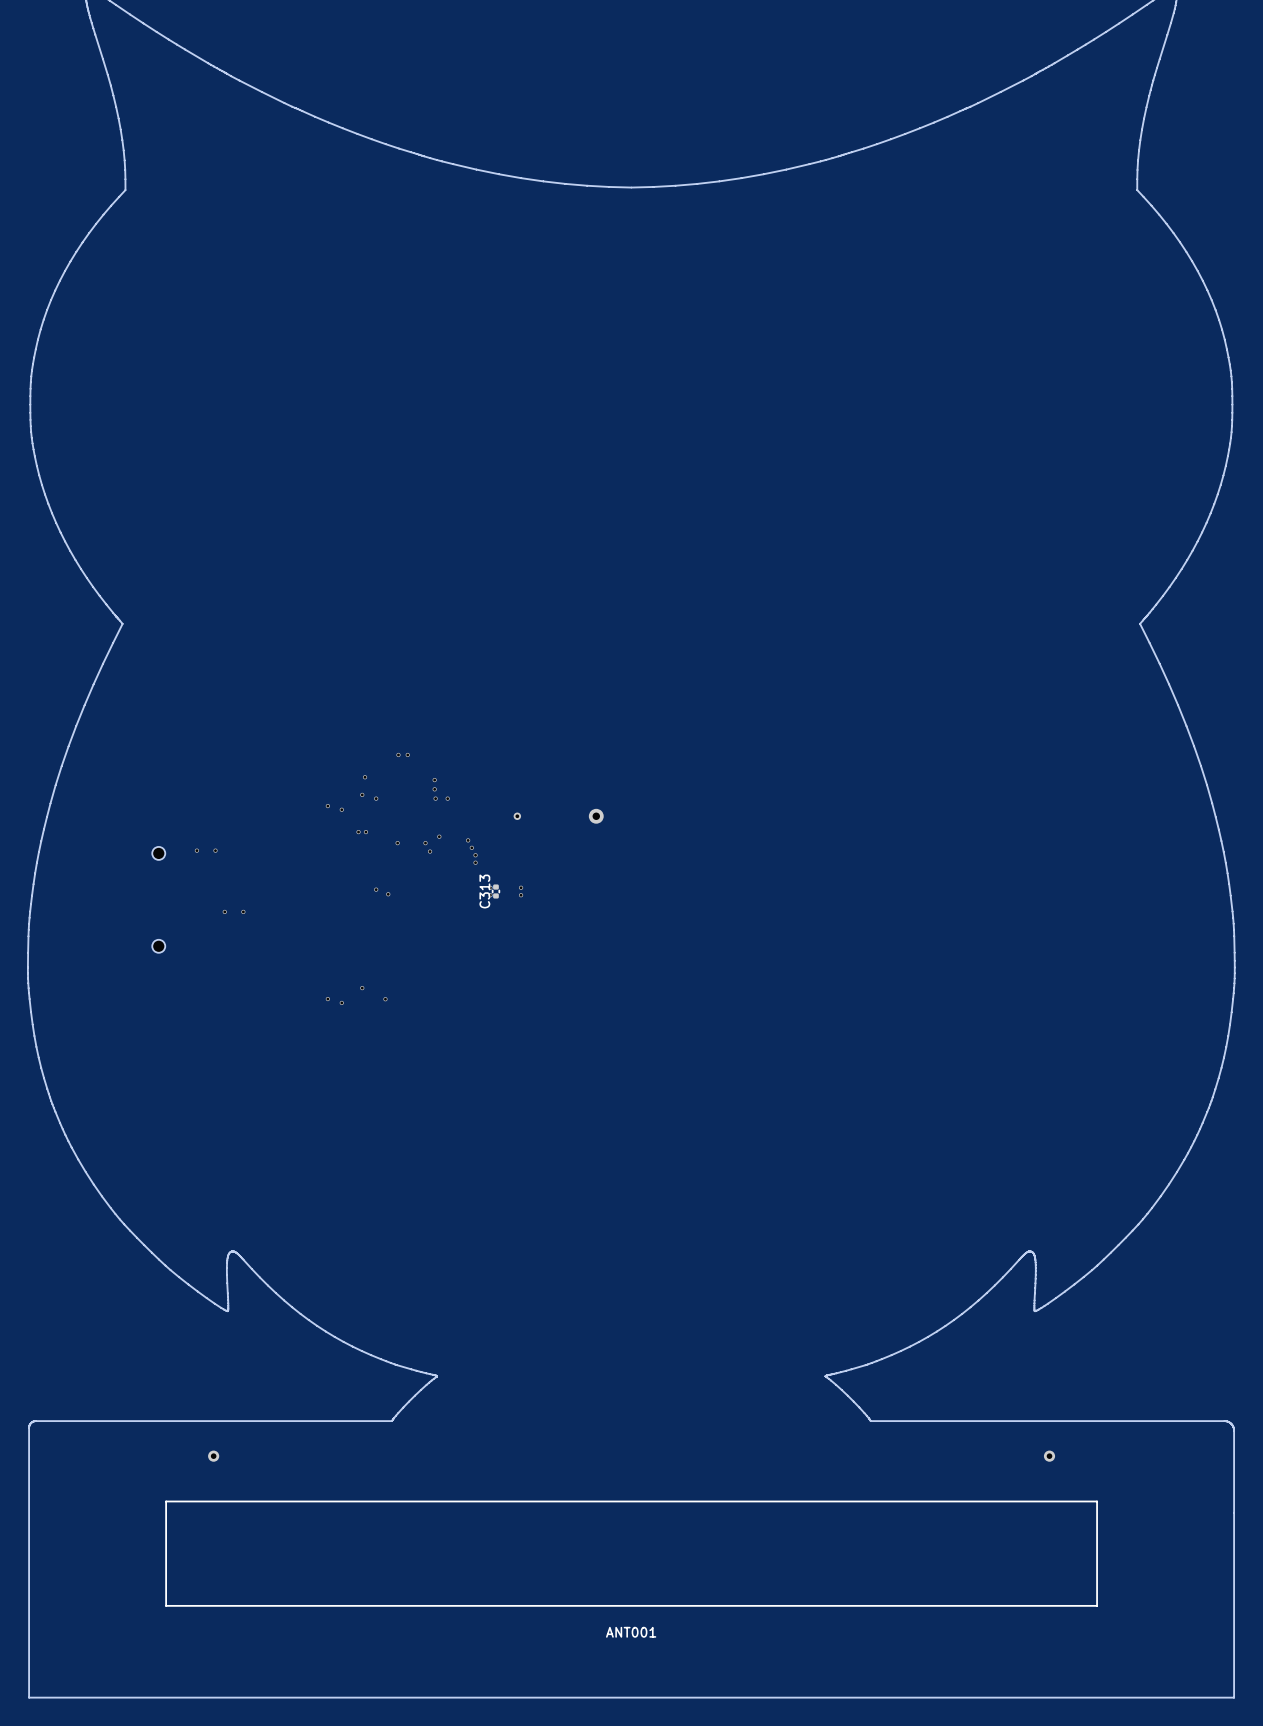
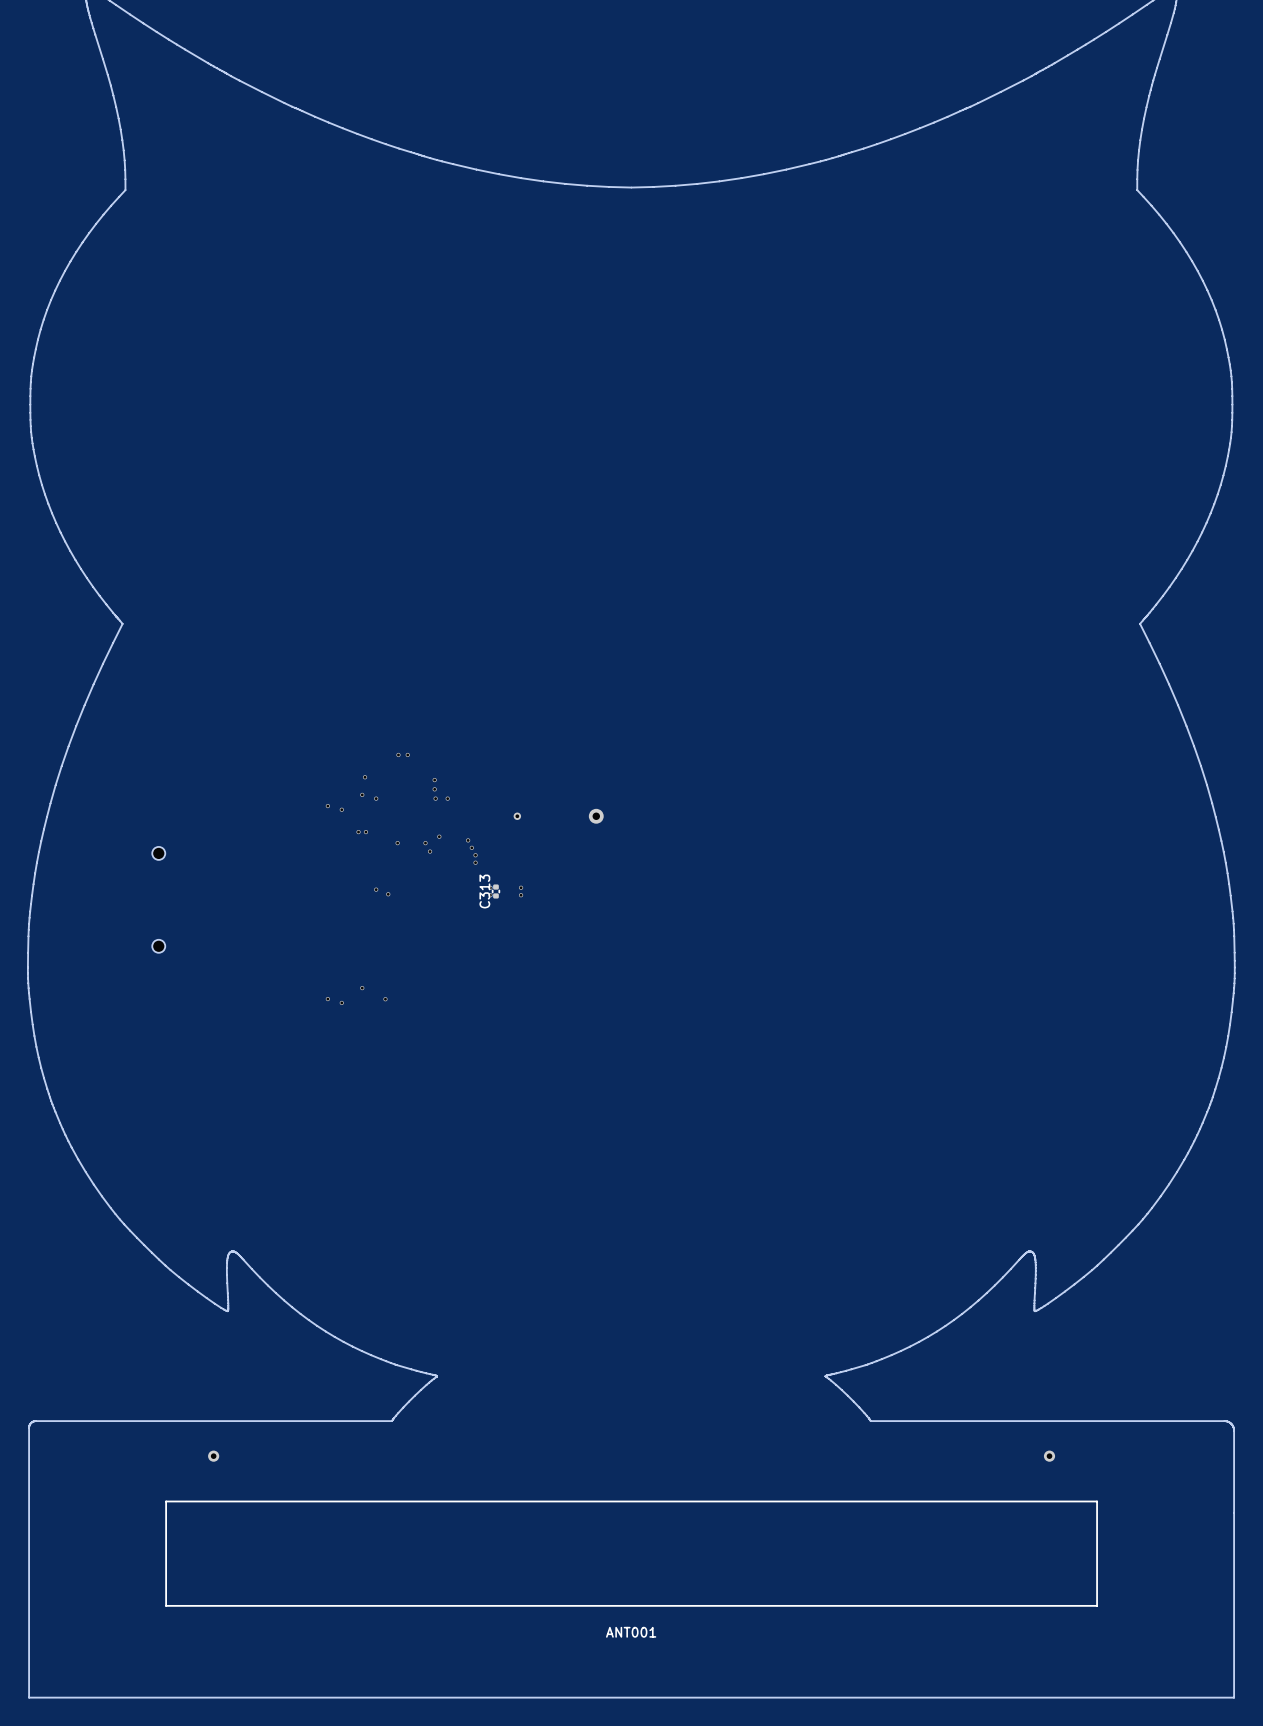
via: (196, 850) -> none
via: (215, 850) -> none
via: (224, 911) -> none
via: (243, 911) -> none

